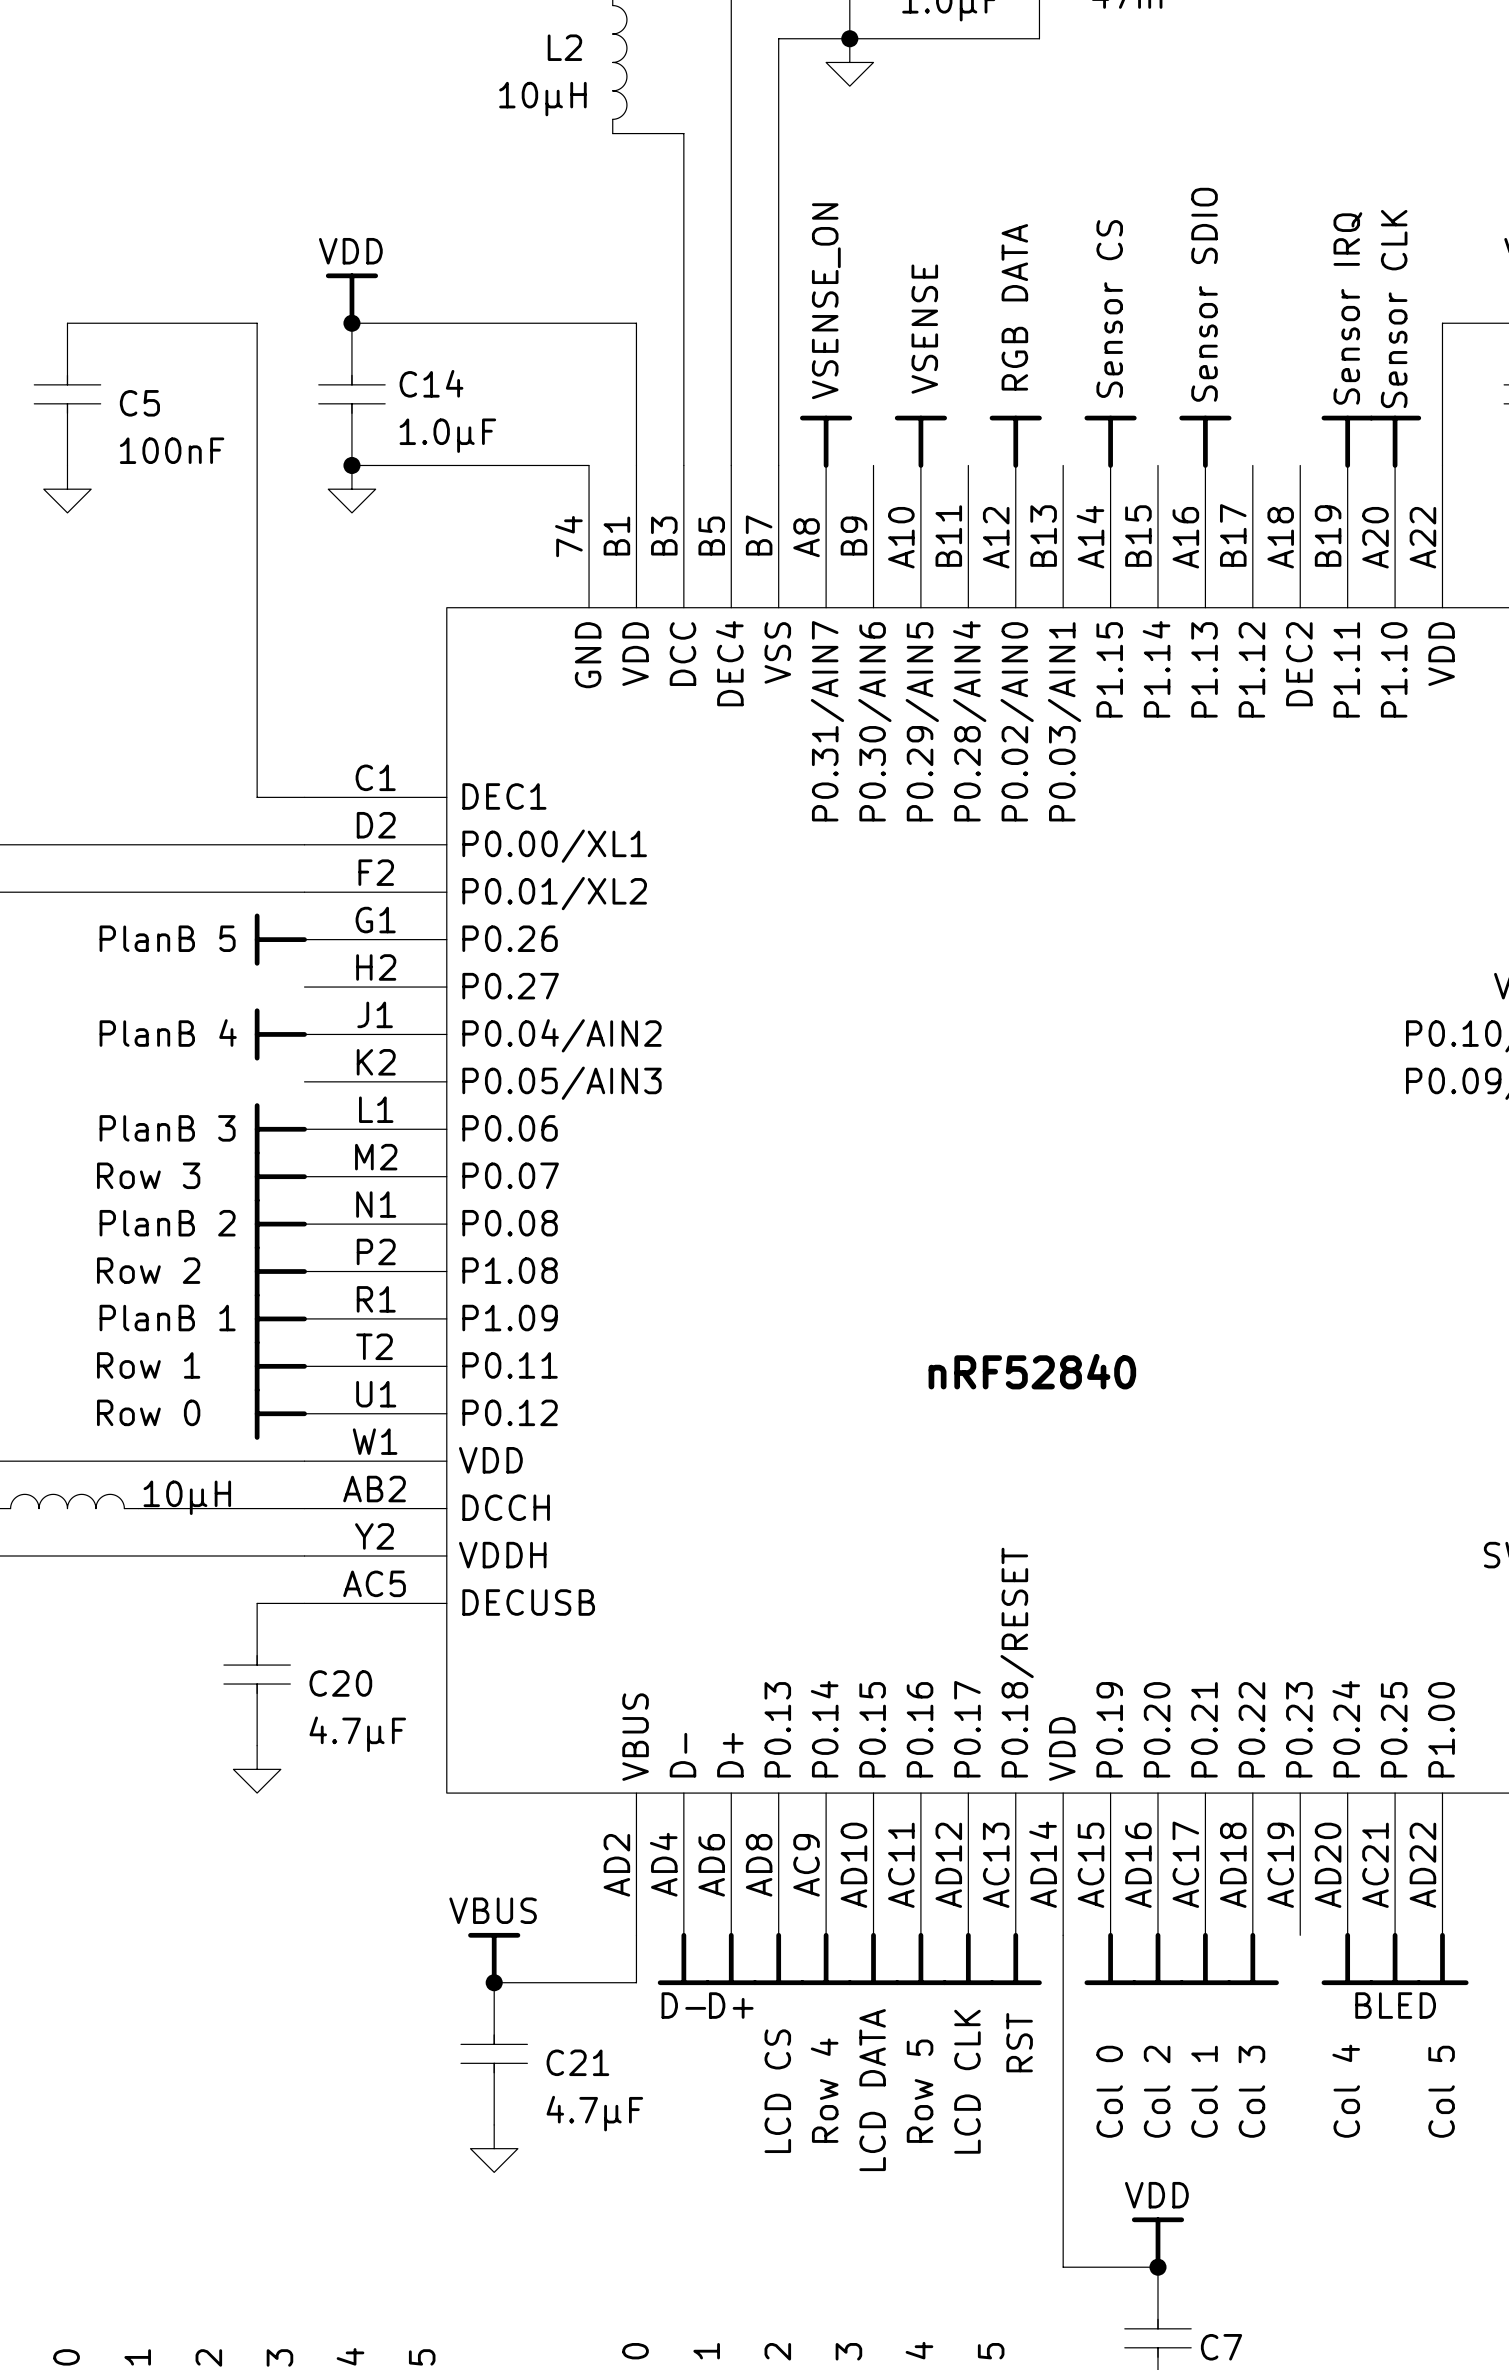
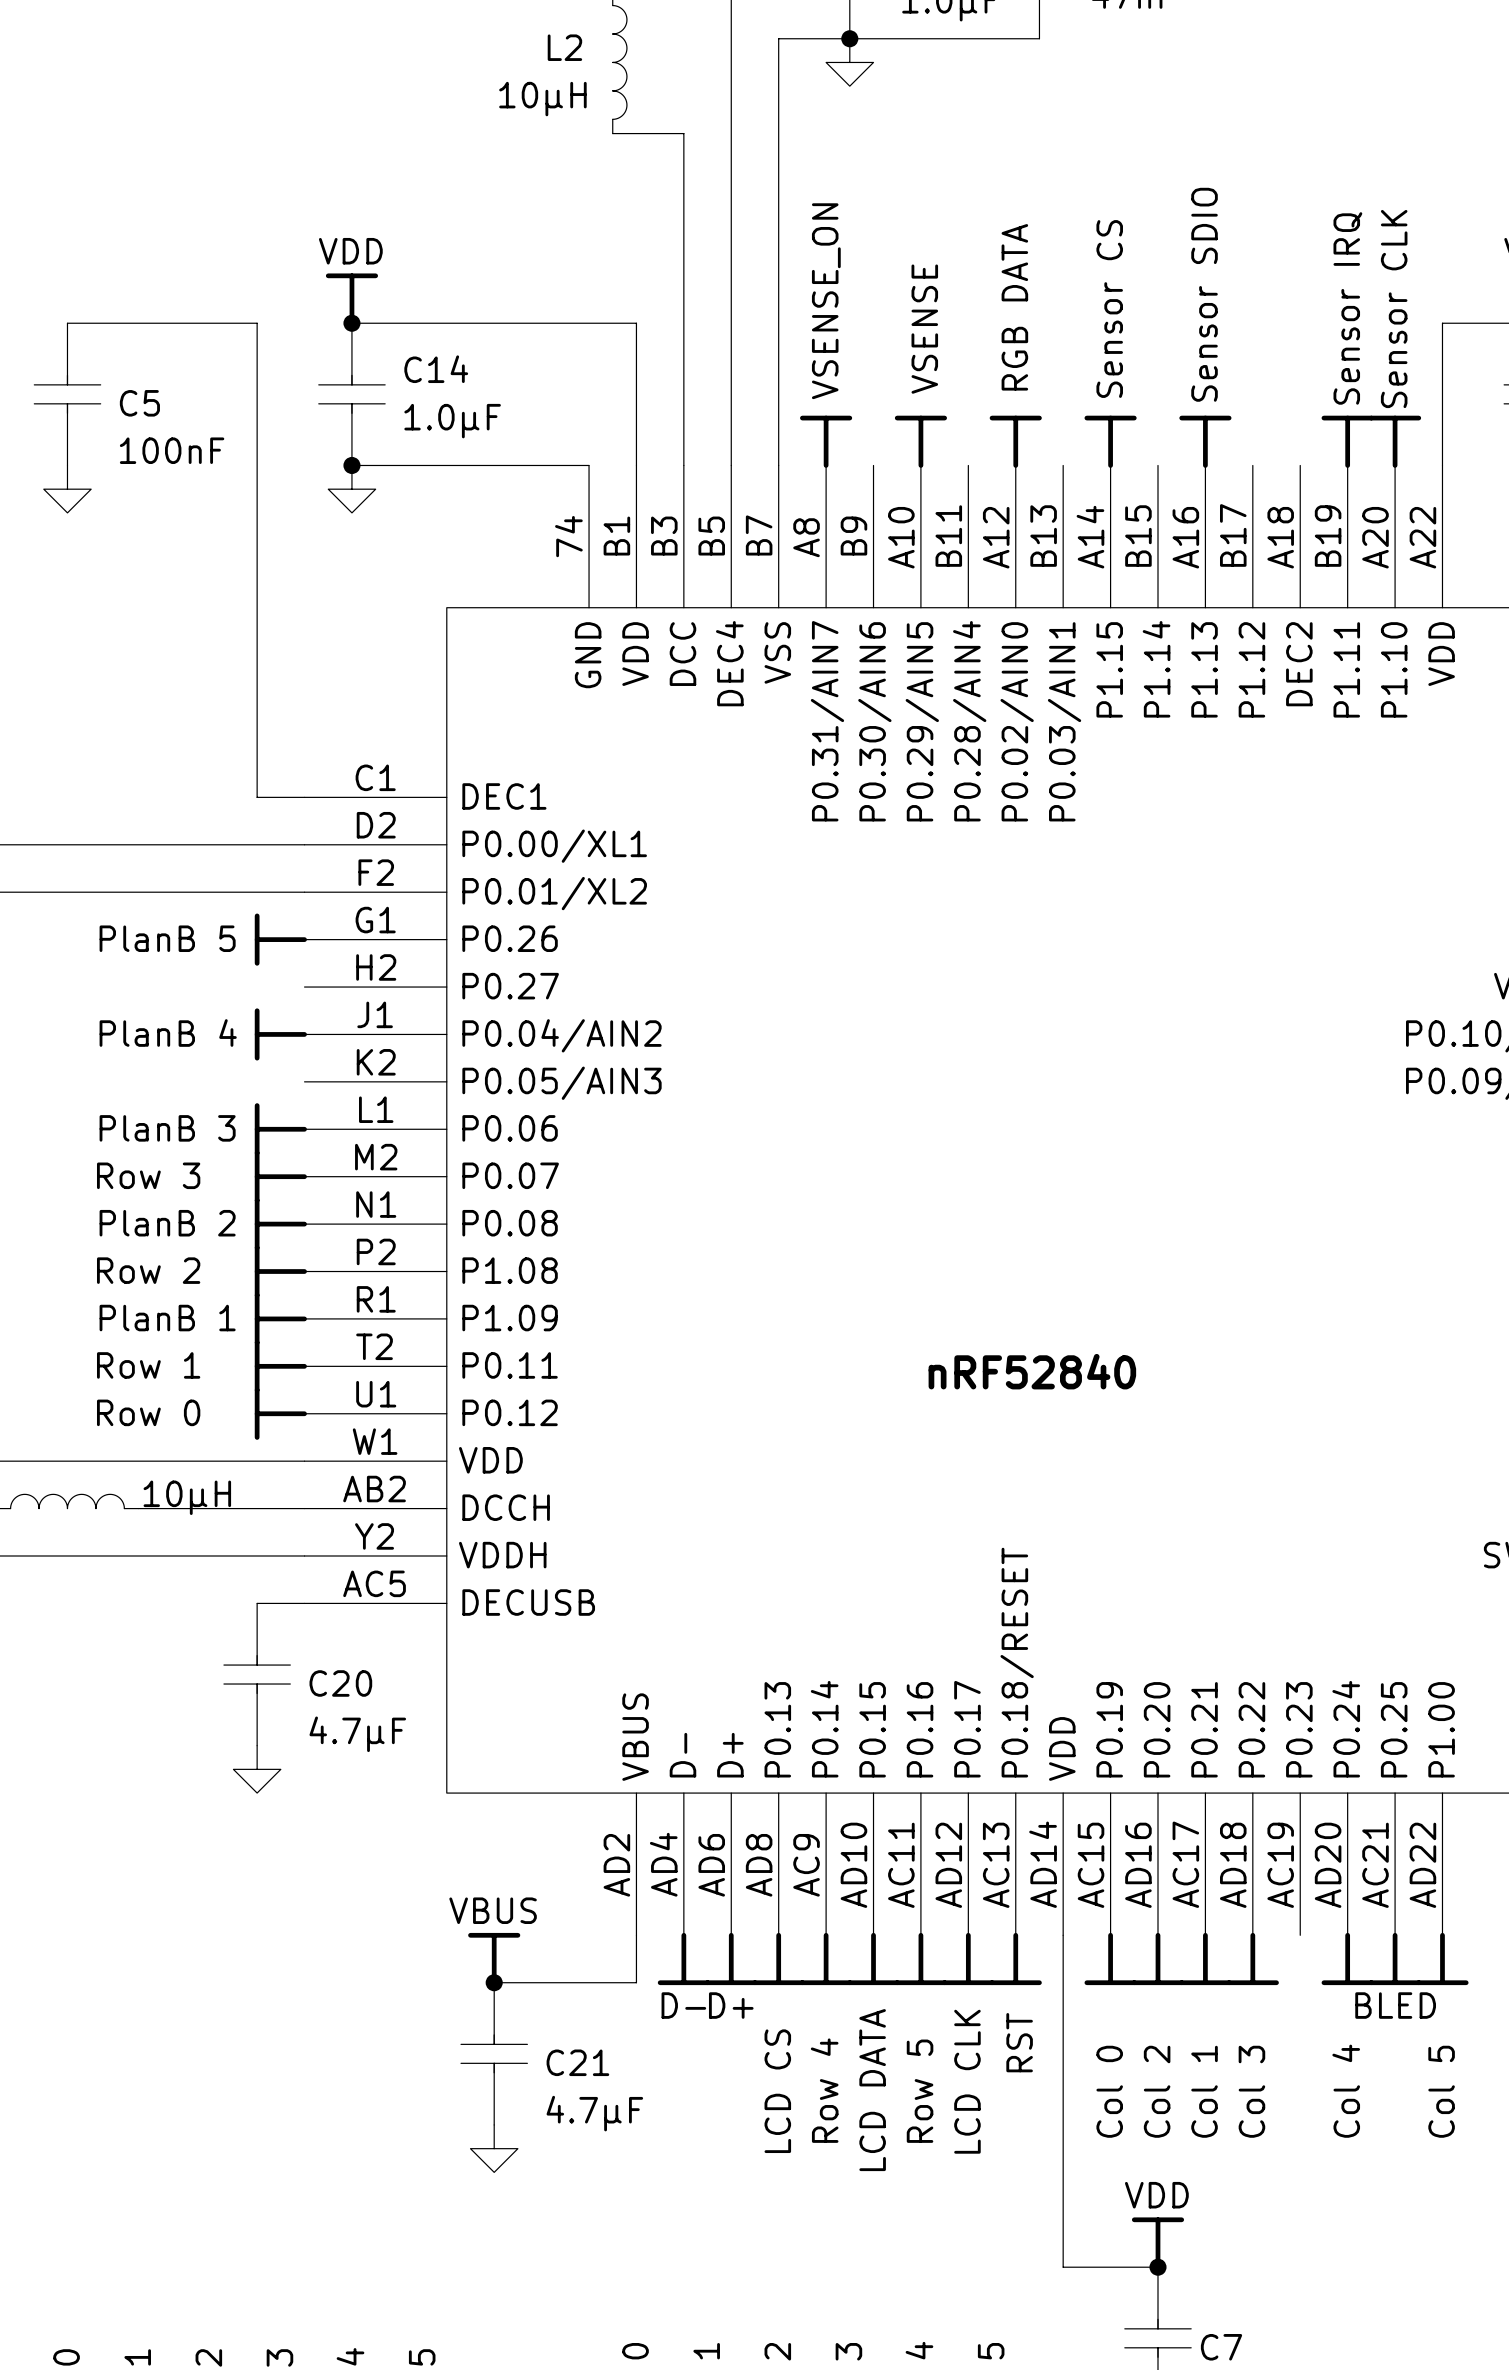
C14 name position: C14 (431, 383) -> C14 (436, 369)
C14 value position: 1.0µF (447, 435) -> 1.0µF (452, 421)

